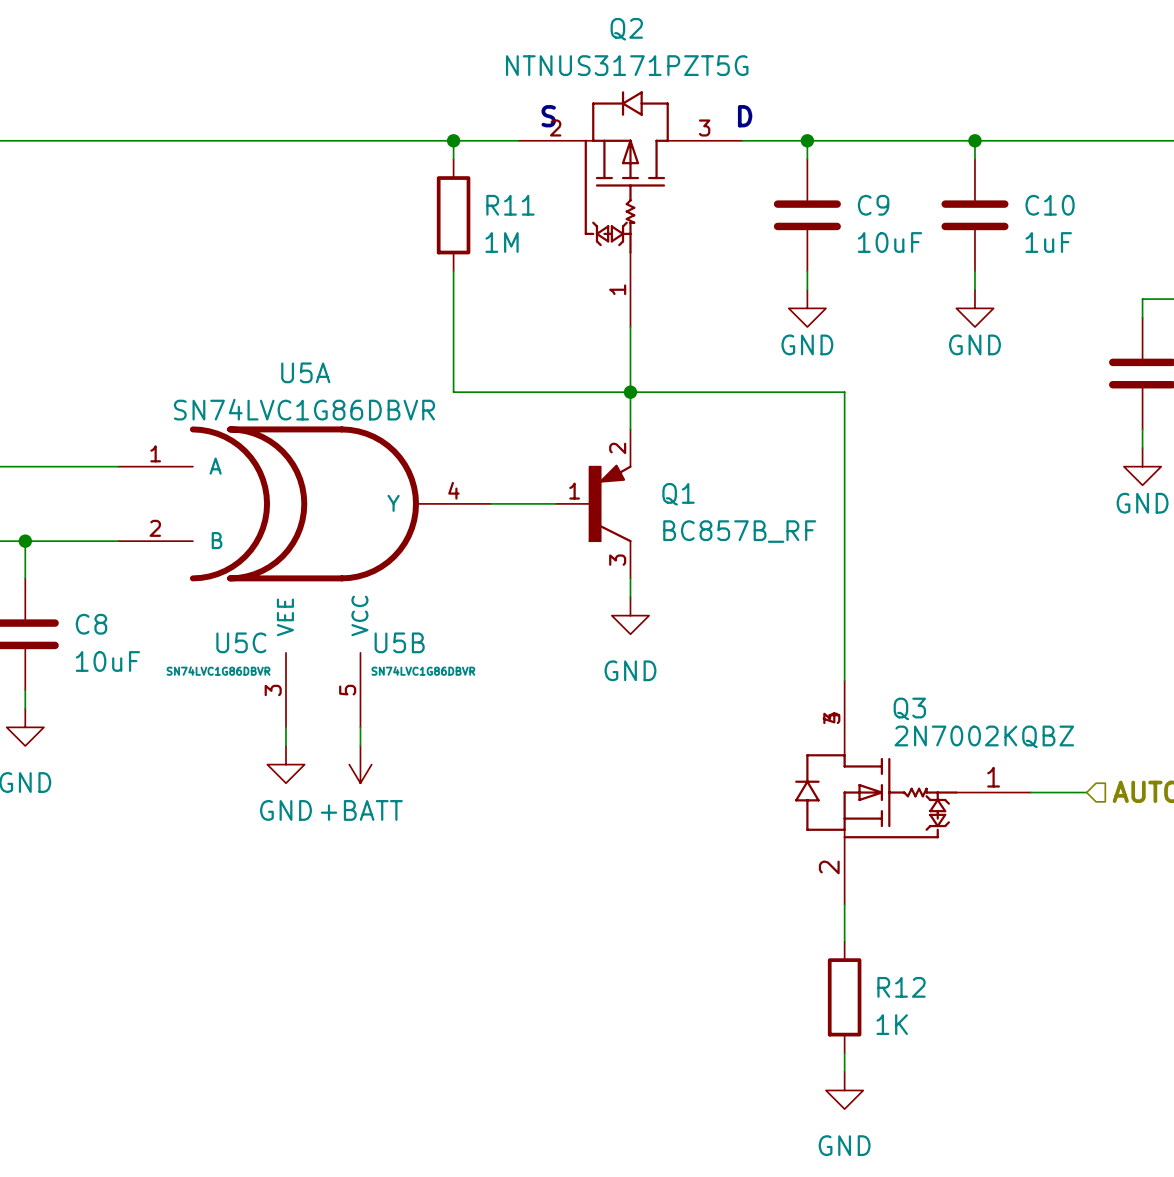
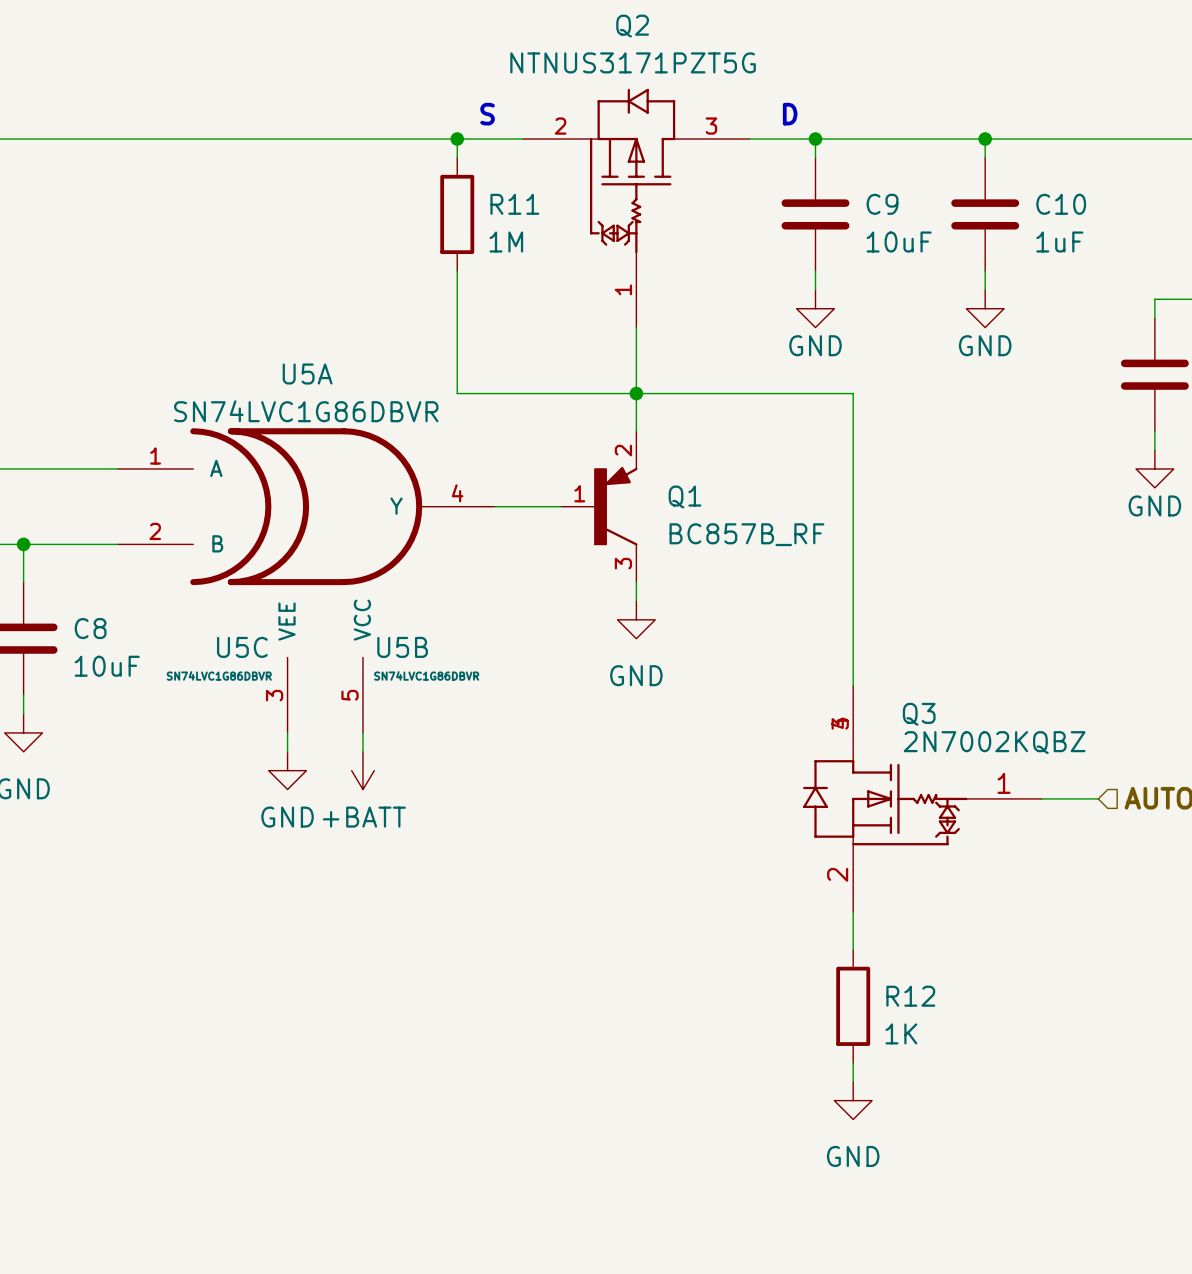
text position: S (548, 116) -> S (487, 114)
text position: D (745, 116) -> D (790, 114)

